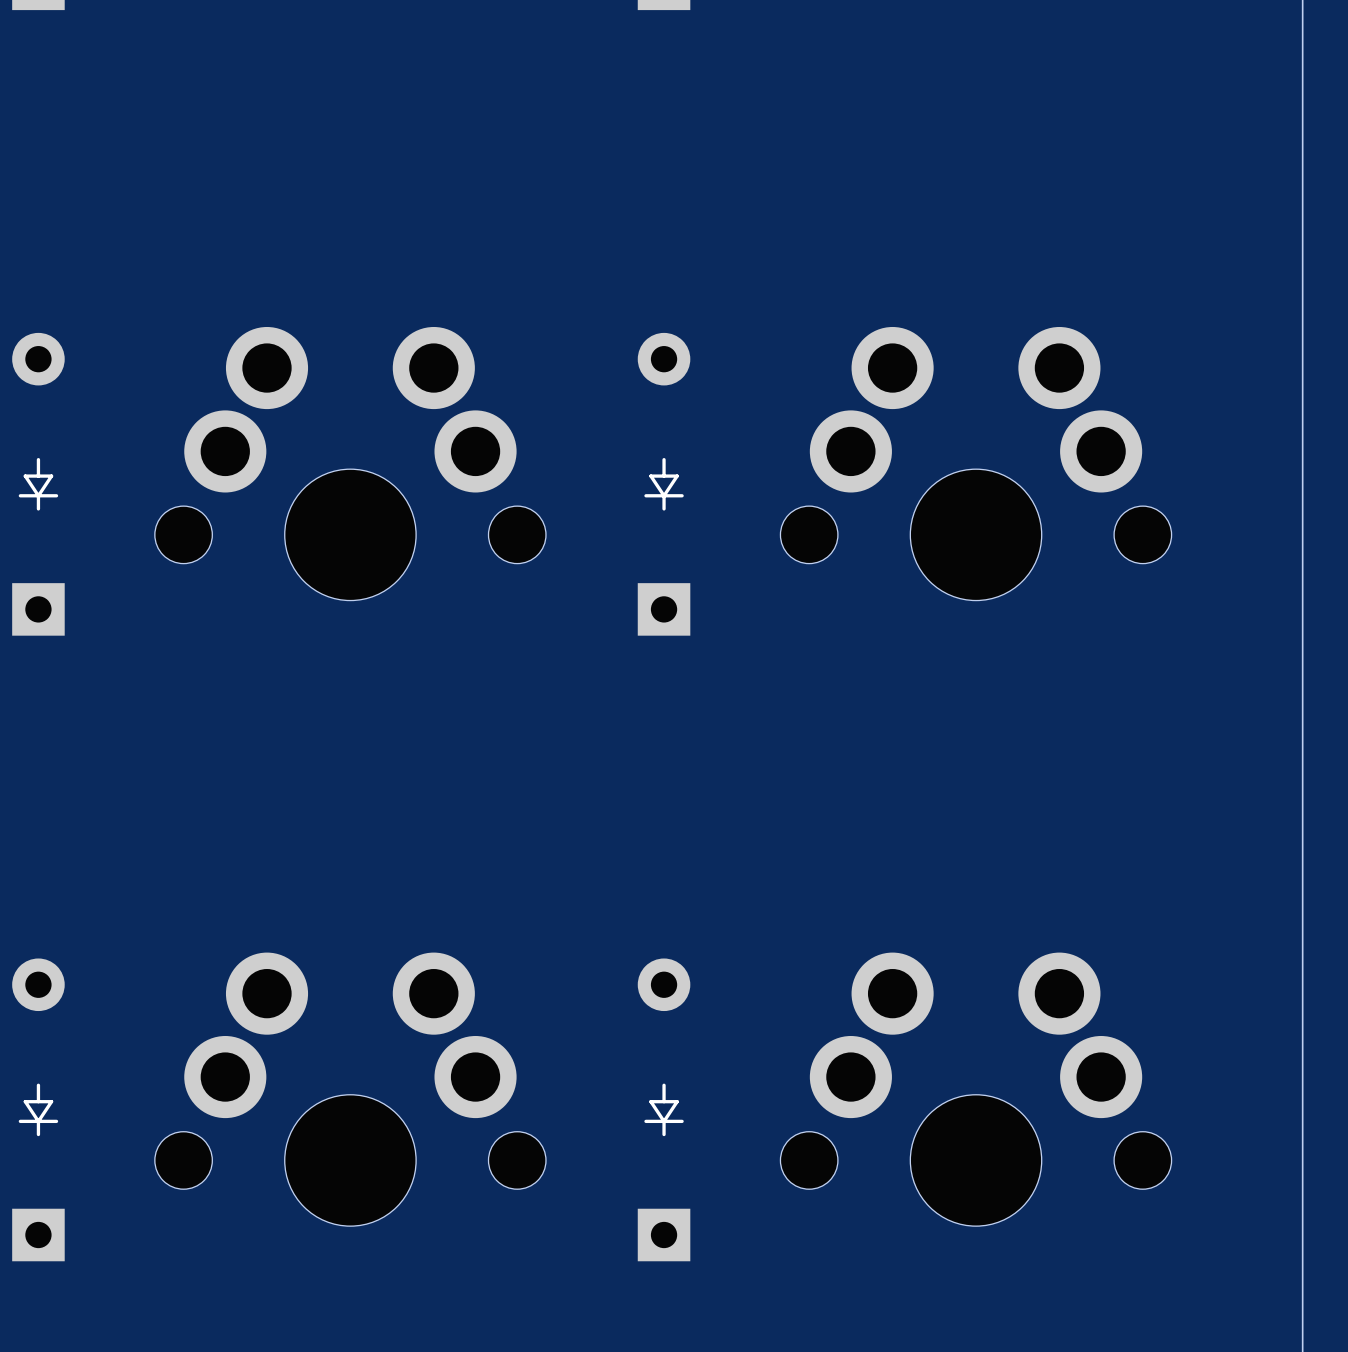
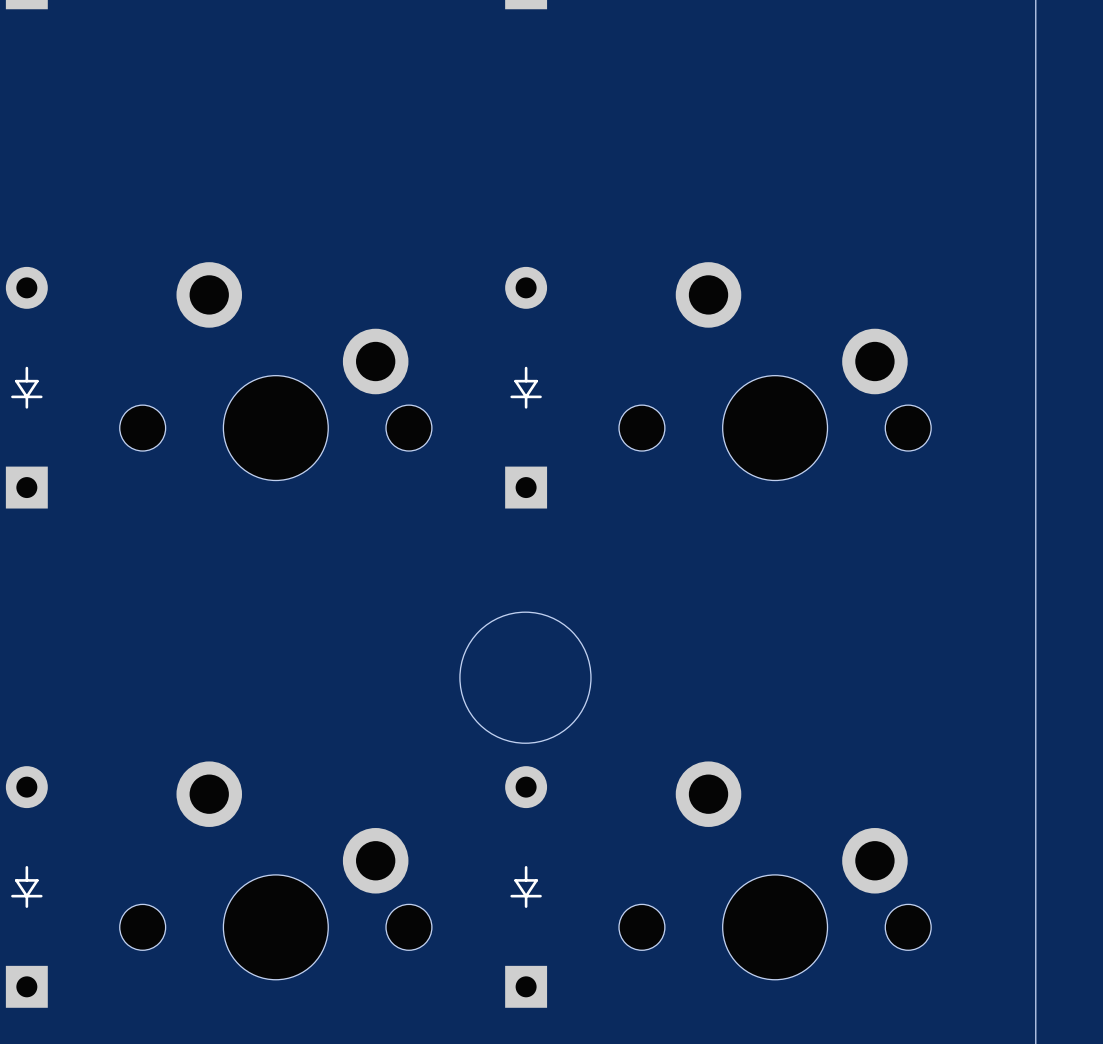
part footprint: [154, 326, 546, 601] -> [119, 262, 432, 481]
part footprint: [780, 326, 1172, 601] -> [619, 262, 932, 481]
round board edge: none -> [459, 611, 592, 744]
part footprint: [154, 952, 546, 1227] -> [119, 761, 432, 980]
part footprint: [780, 952, 1172, 1227] -> [619, 761, 932, 980]

